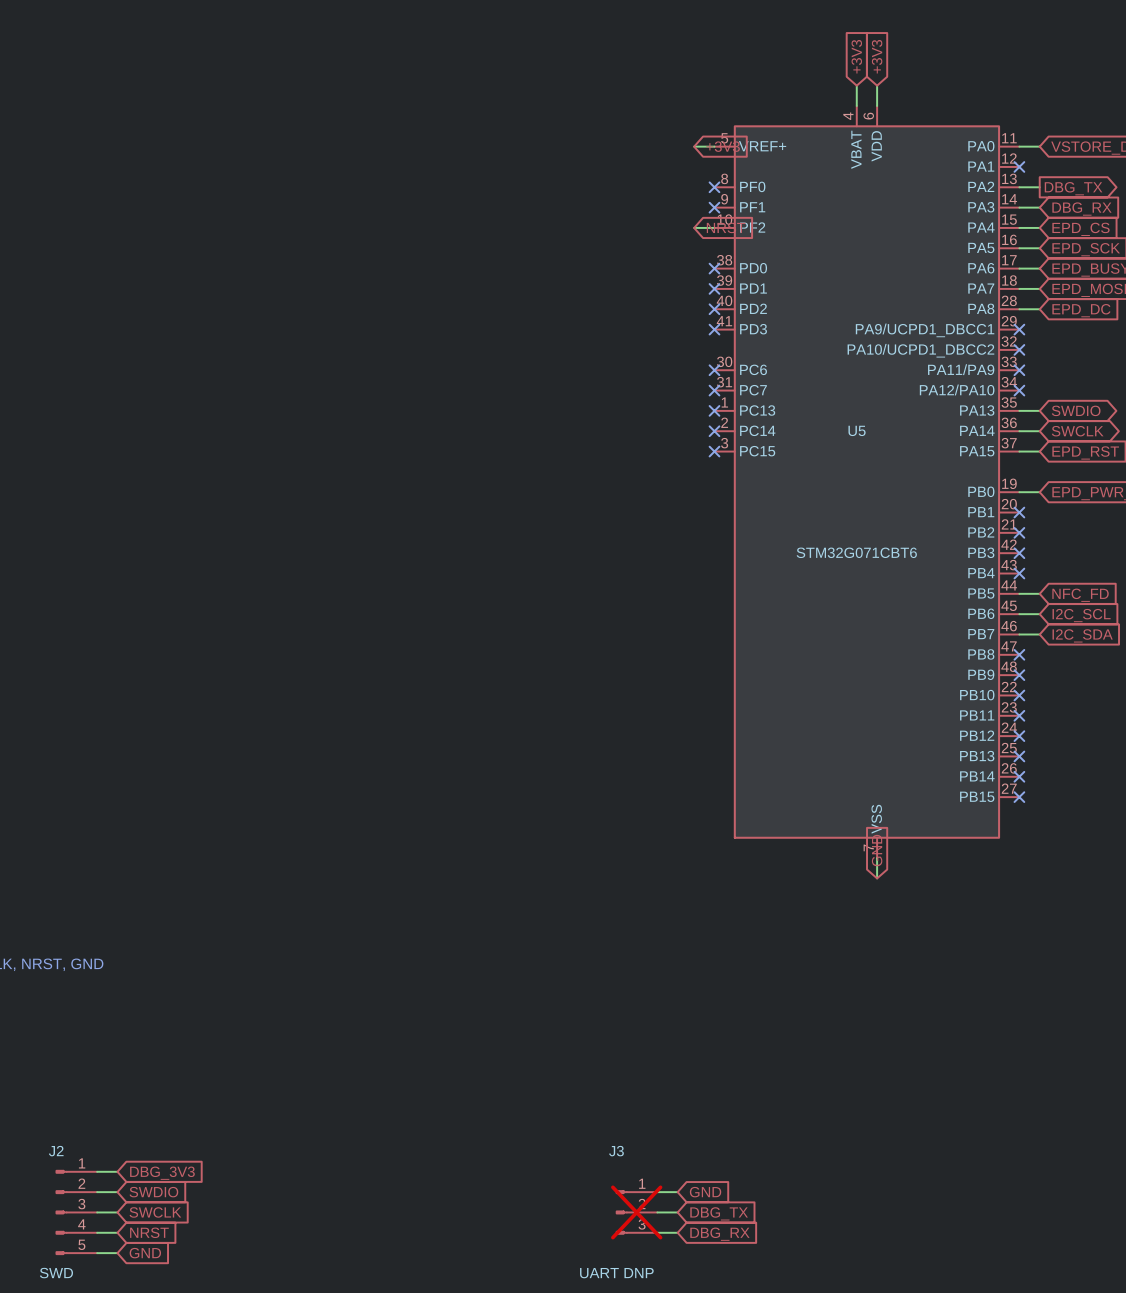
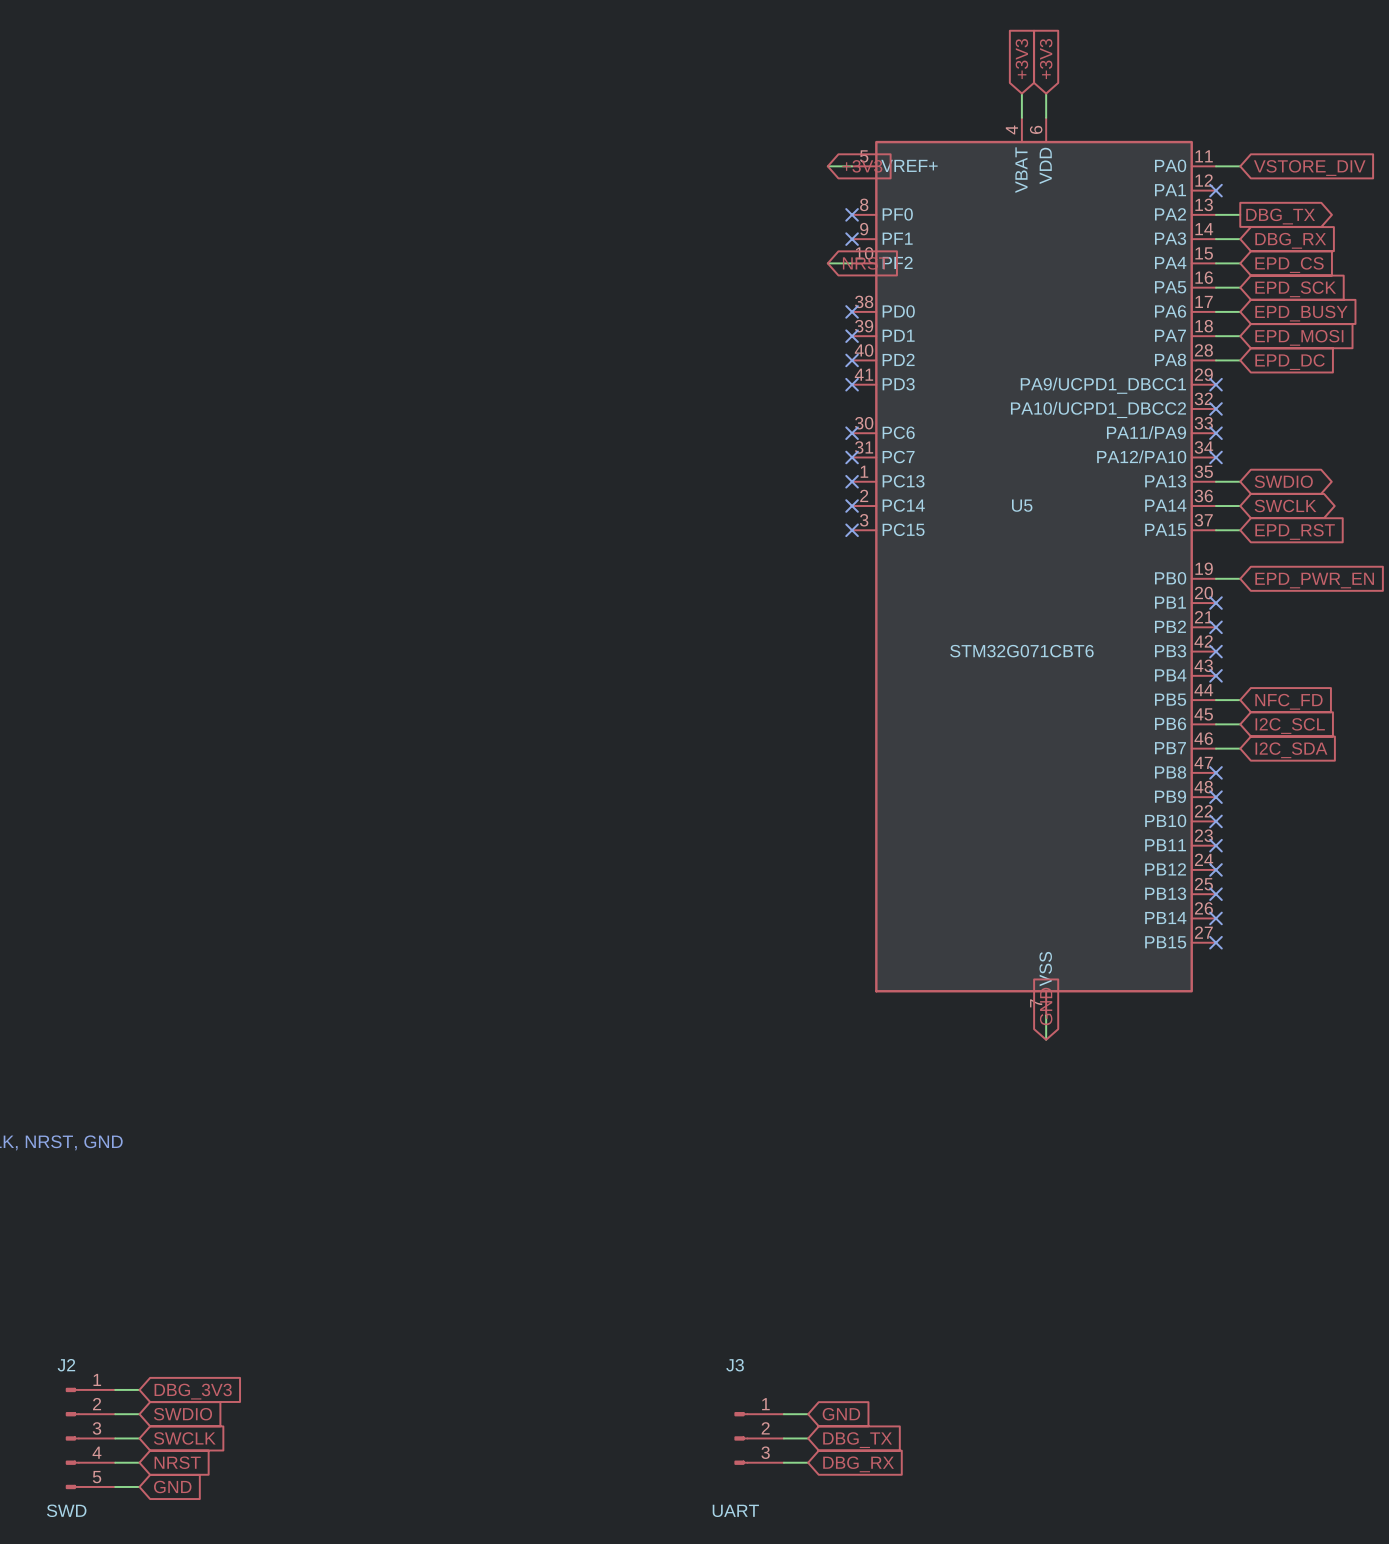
J3 do-not-place cross: (636, 1212) -> none
J3 value: UART DNP (616, 1273) -> UART (735, 1510)

